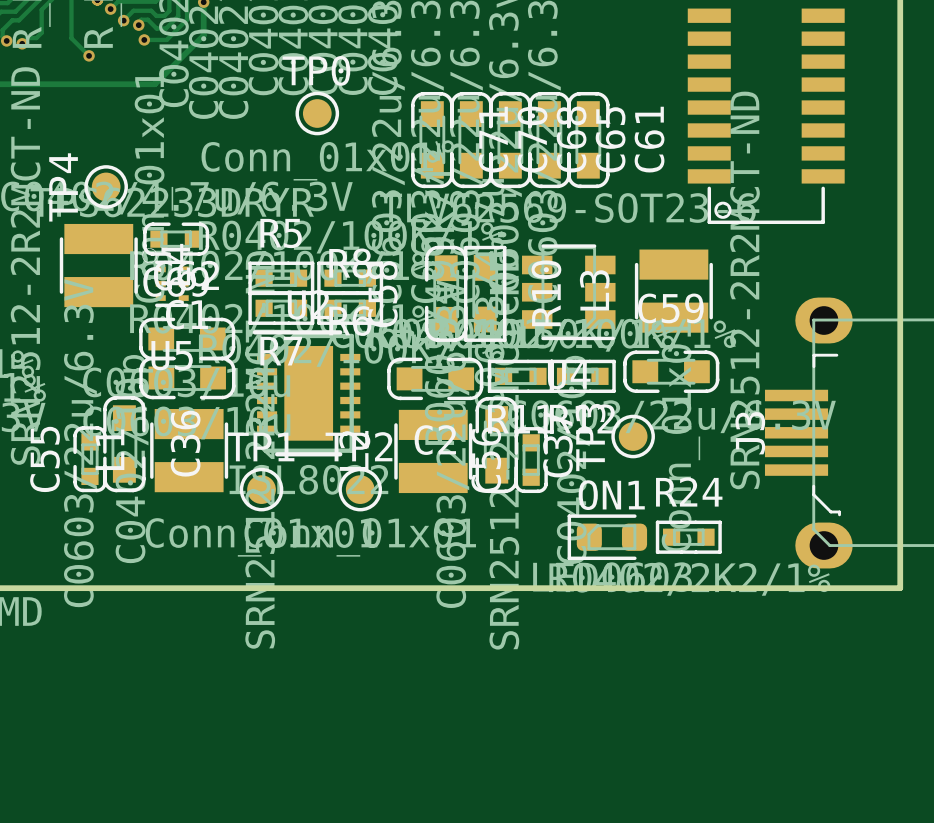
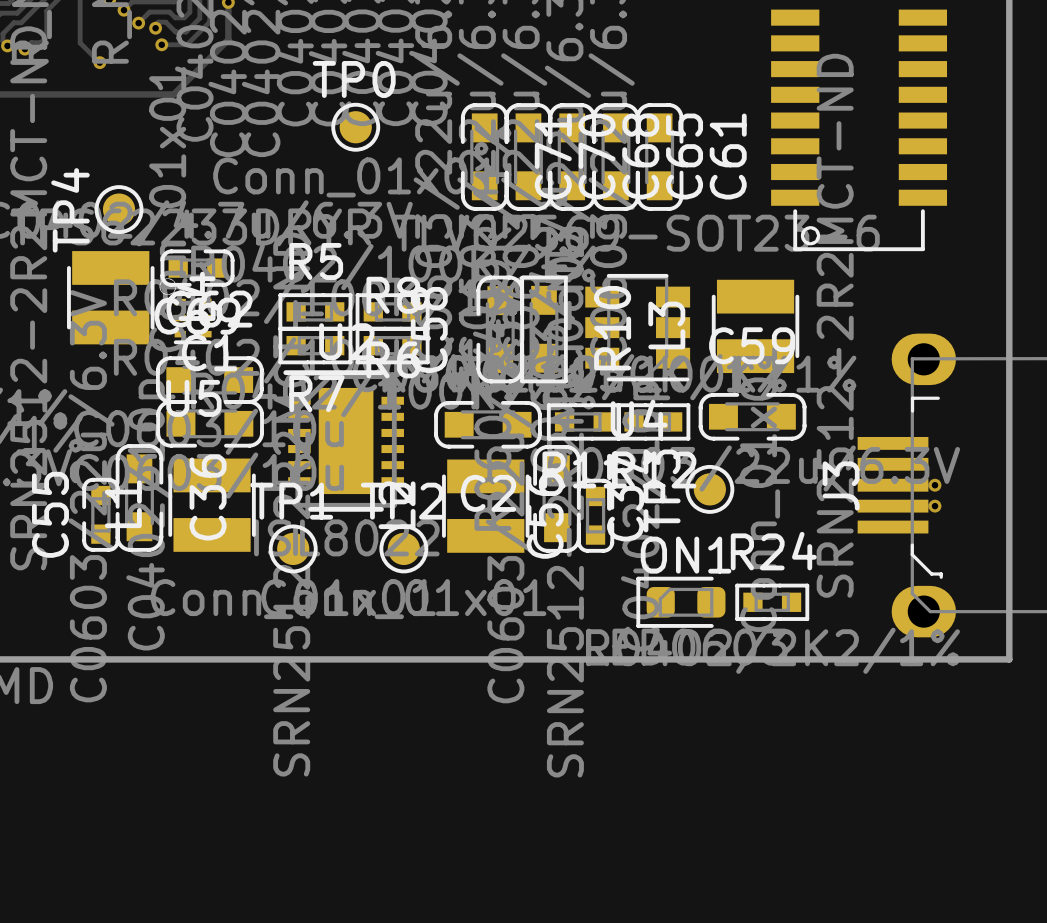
via: none -> (935, 485)
via: none -> (935, 506)

